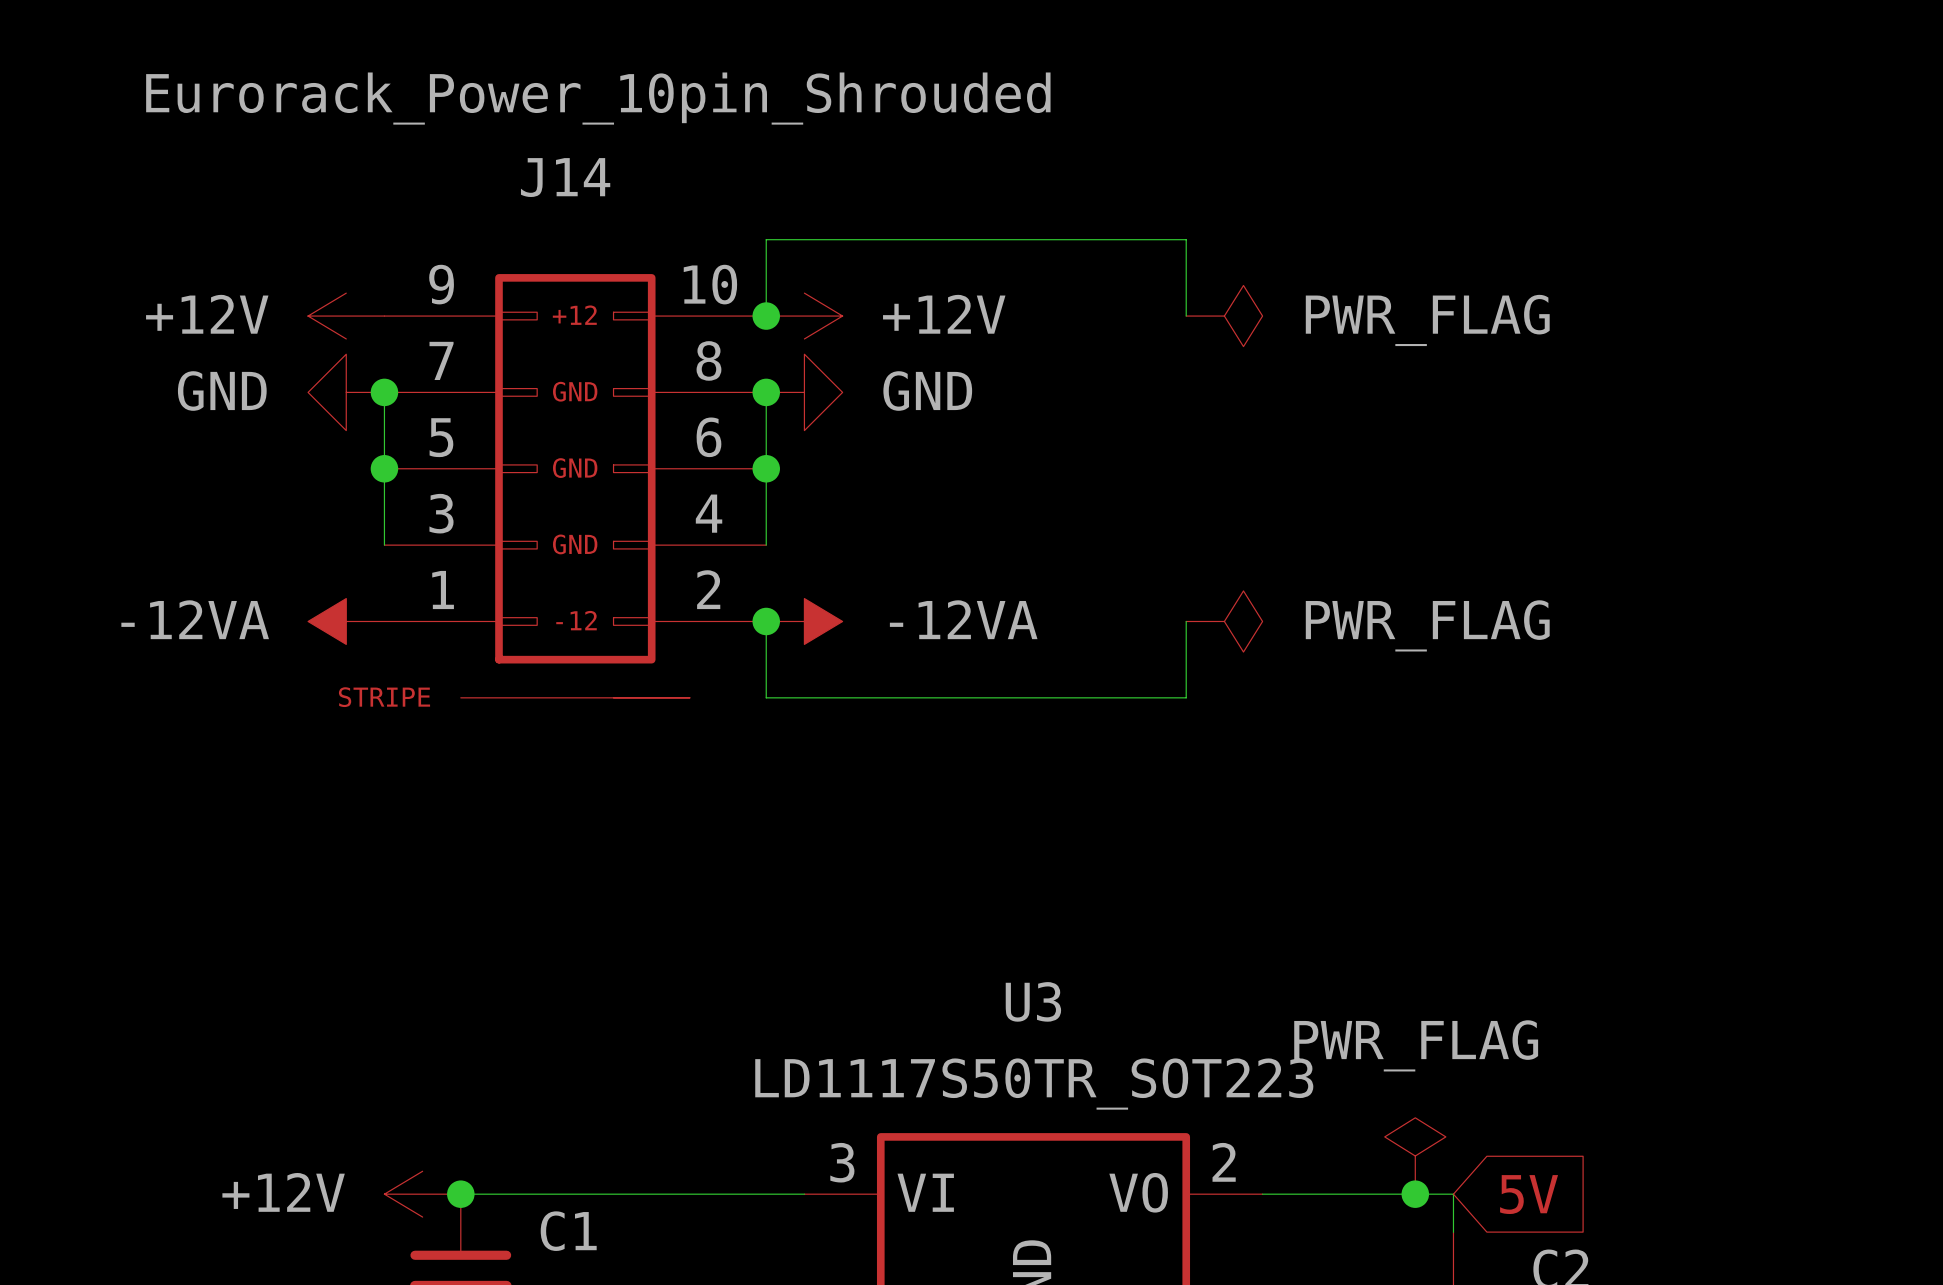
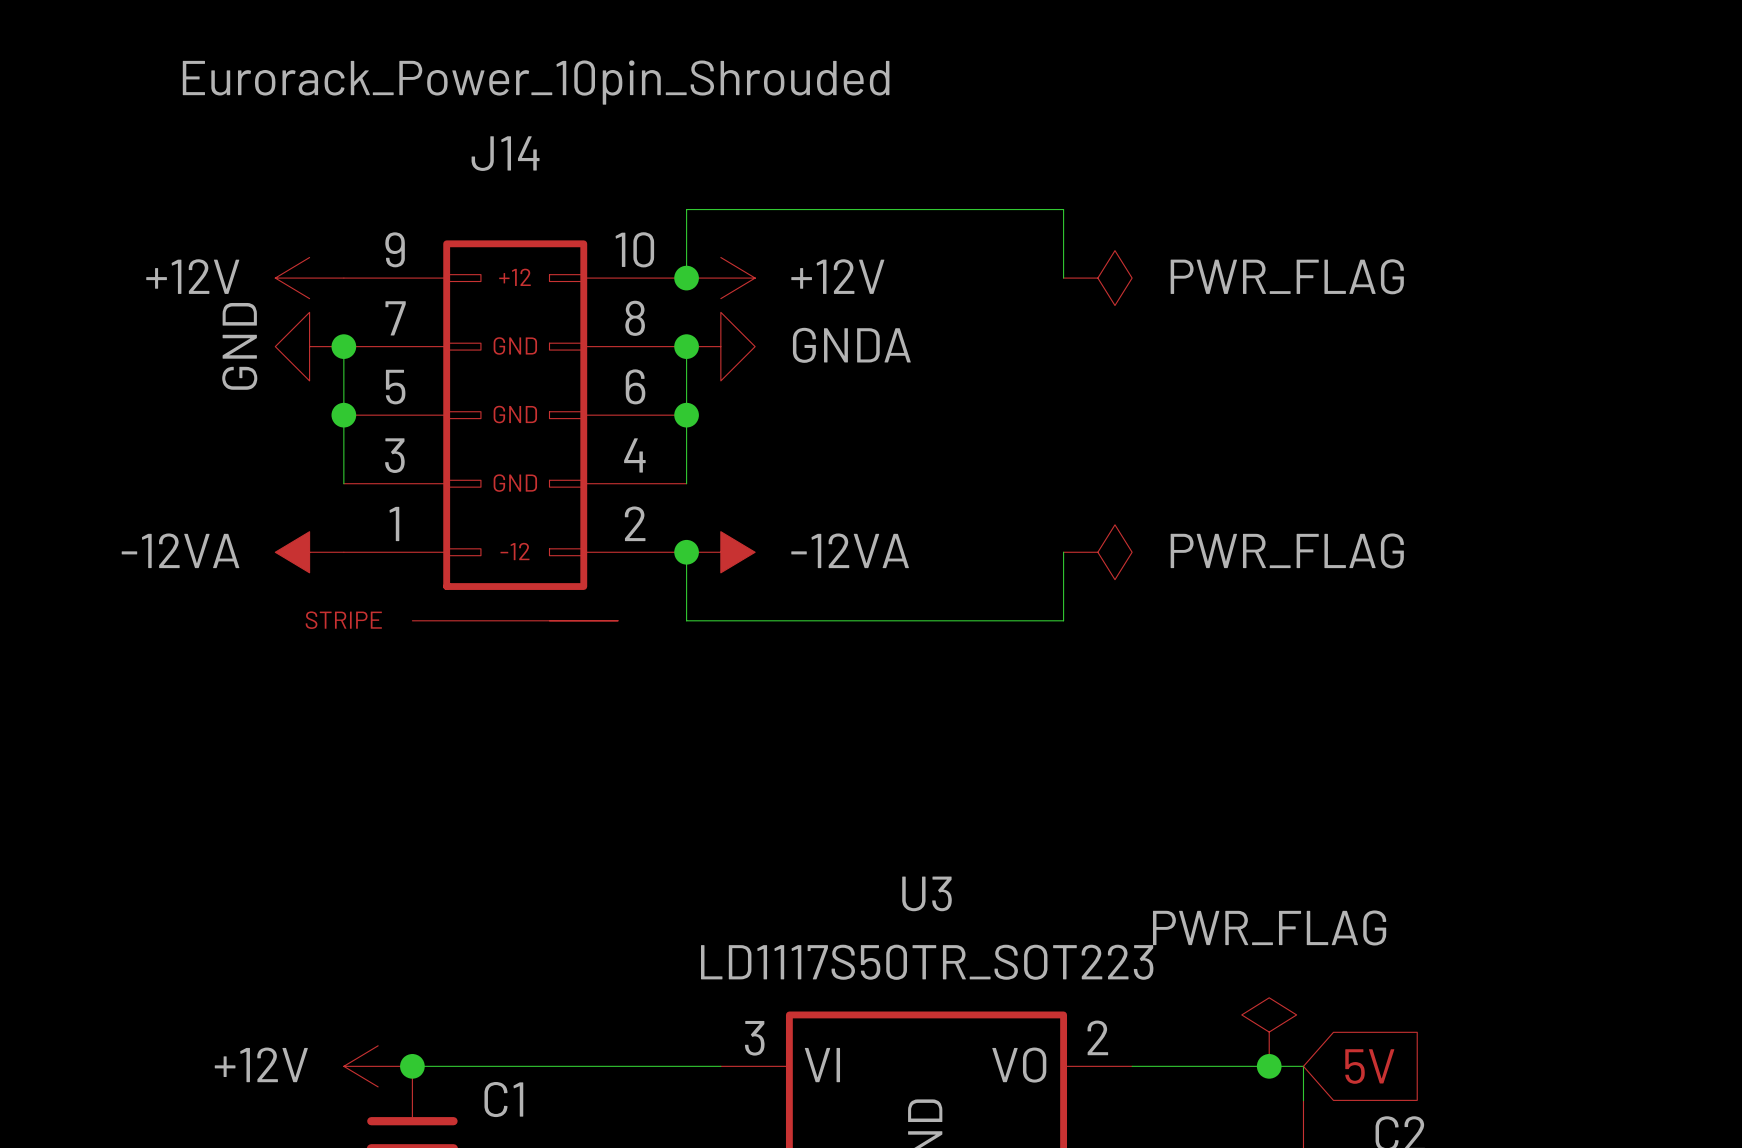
power symbol text rotation: 0° (222, 391) -> 90° counterclockwise (239, 346)
power symbol: GND (804, 392) -> GNDA (720, 346)

